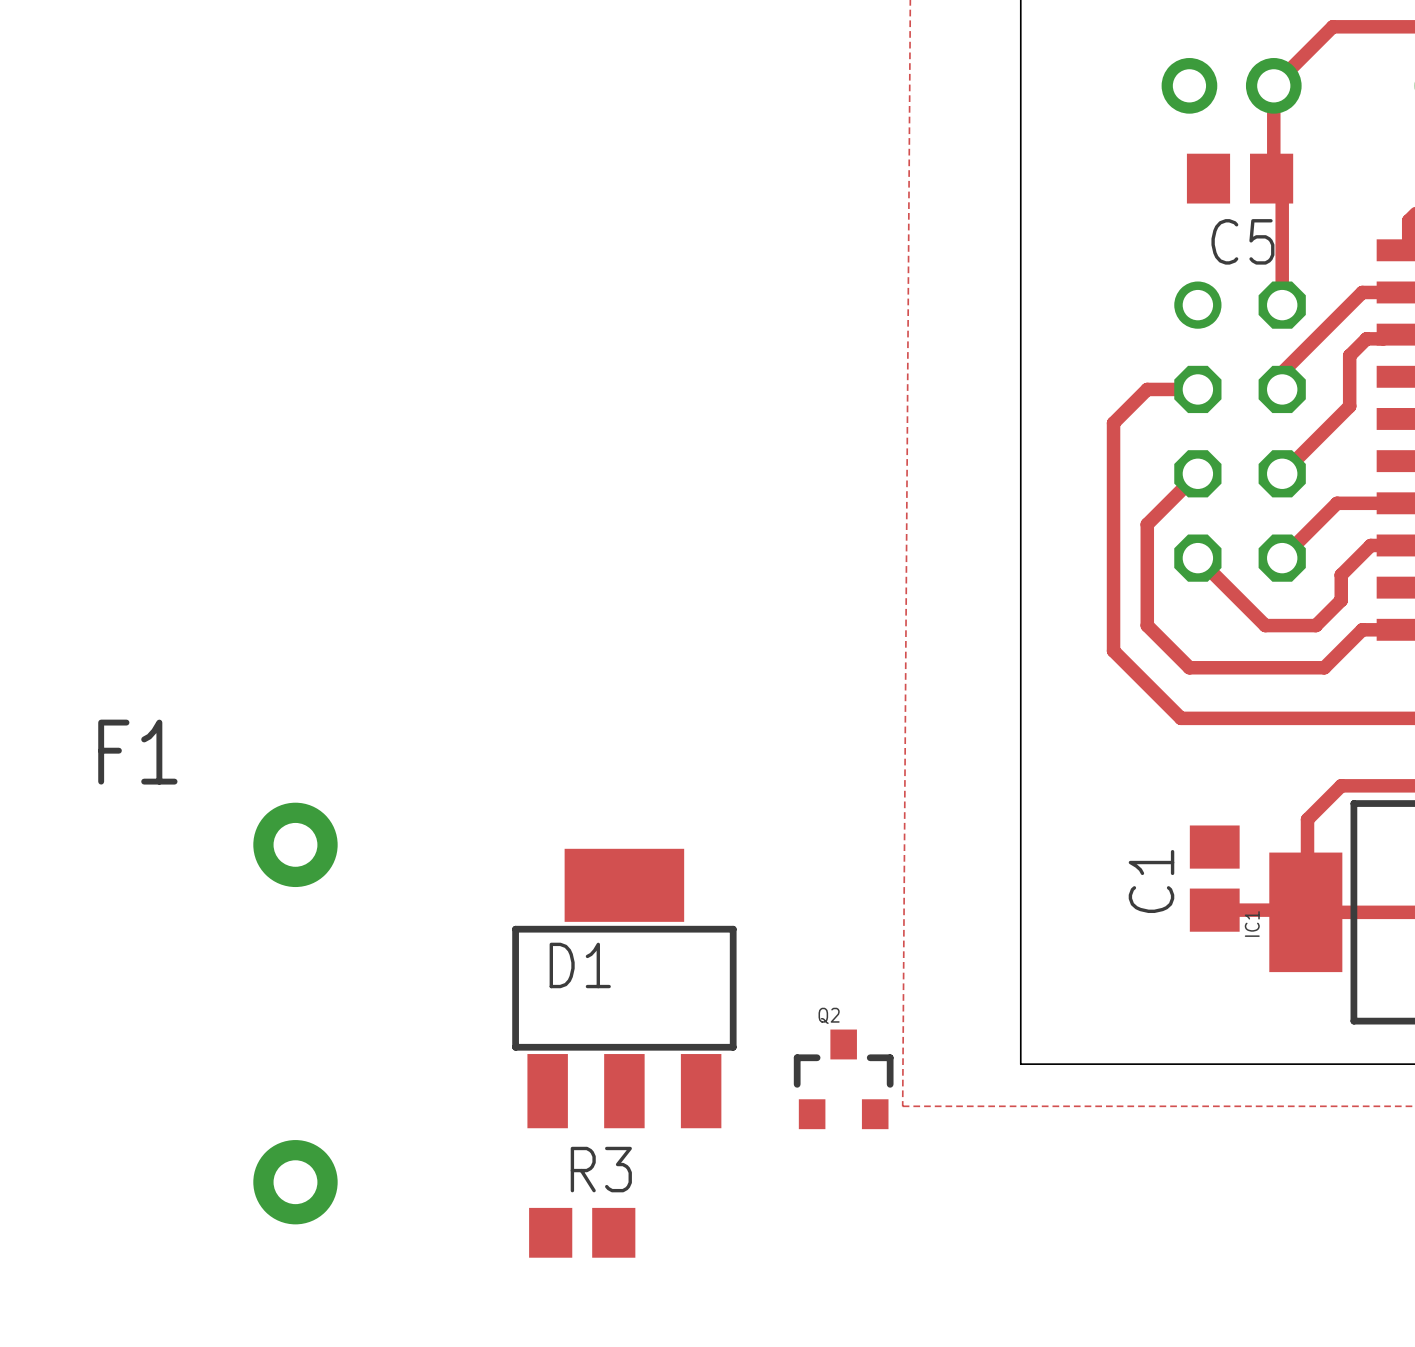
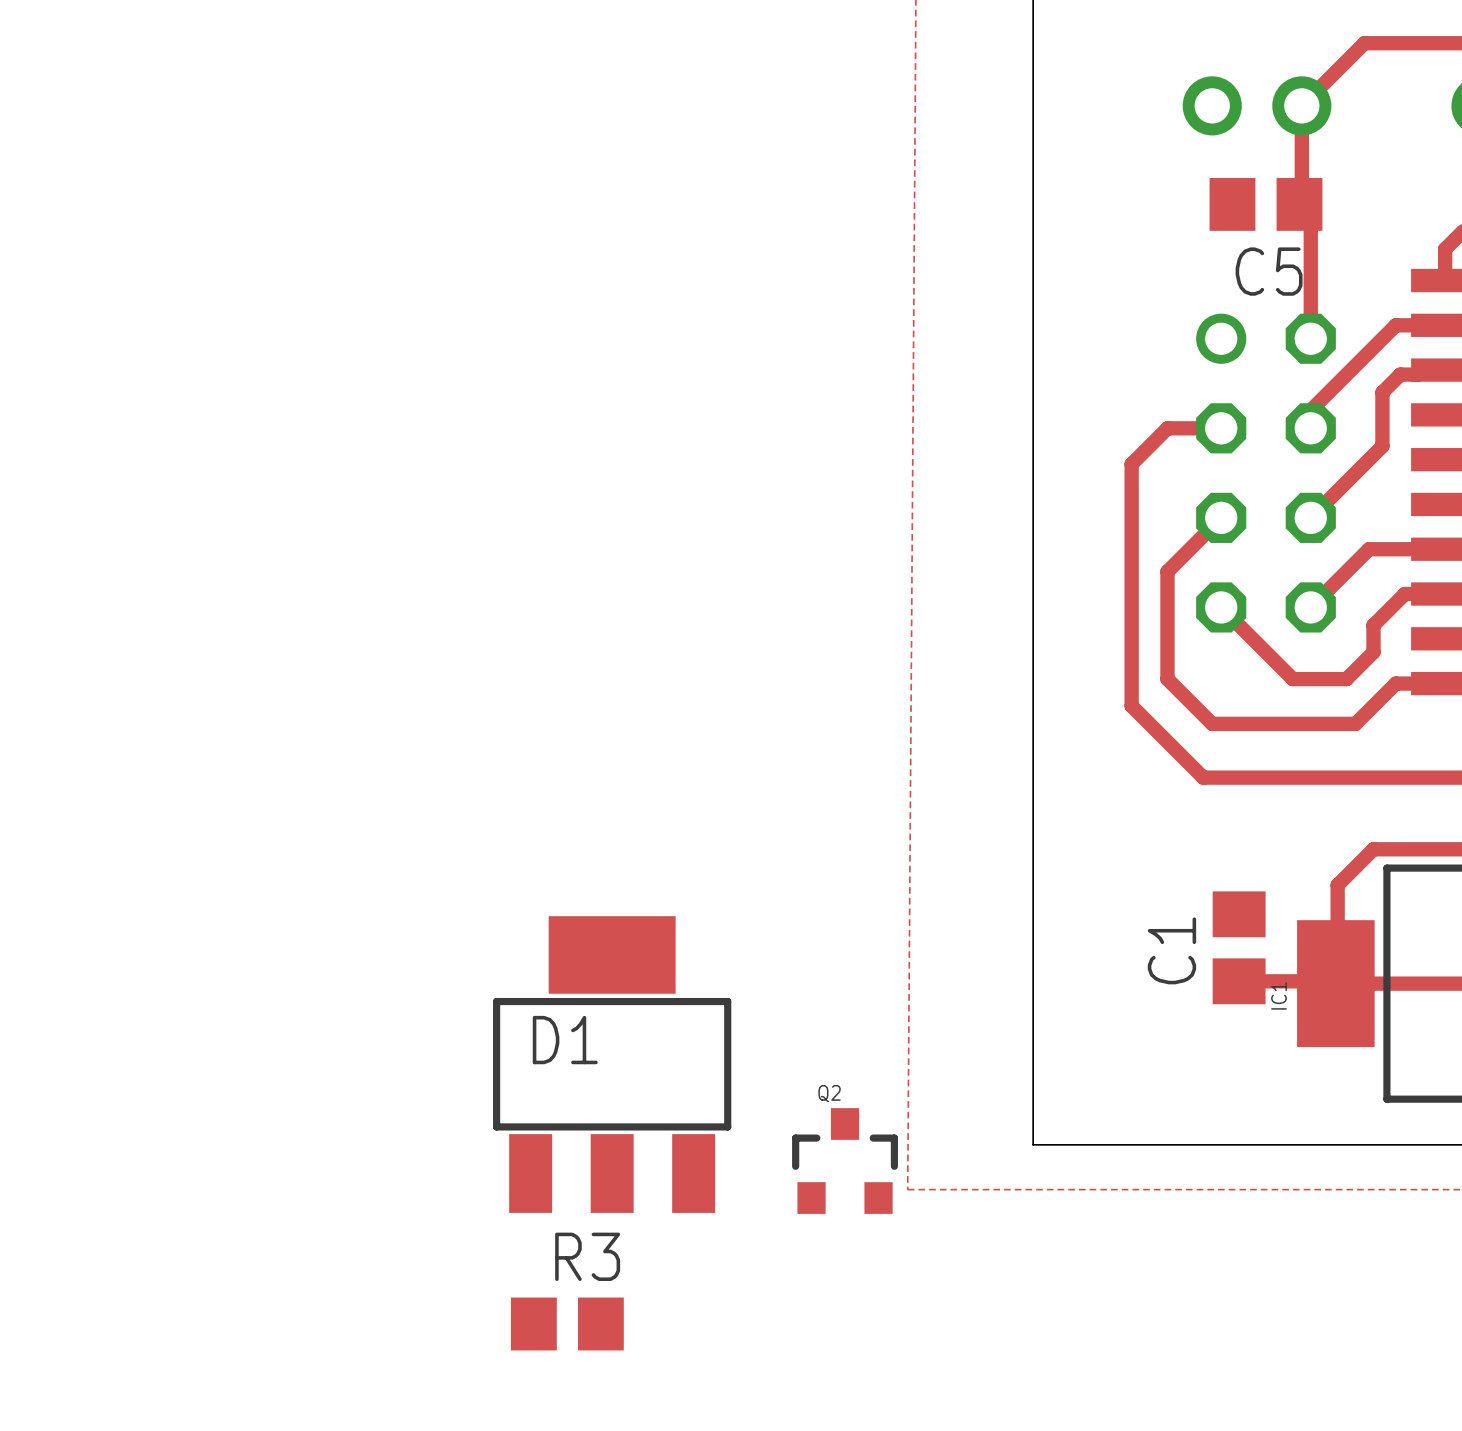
F1: (295, 1013) -> none

